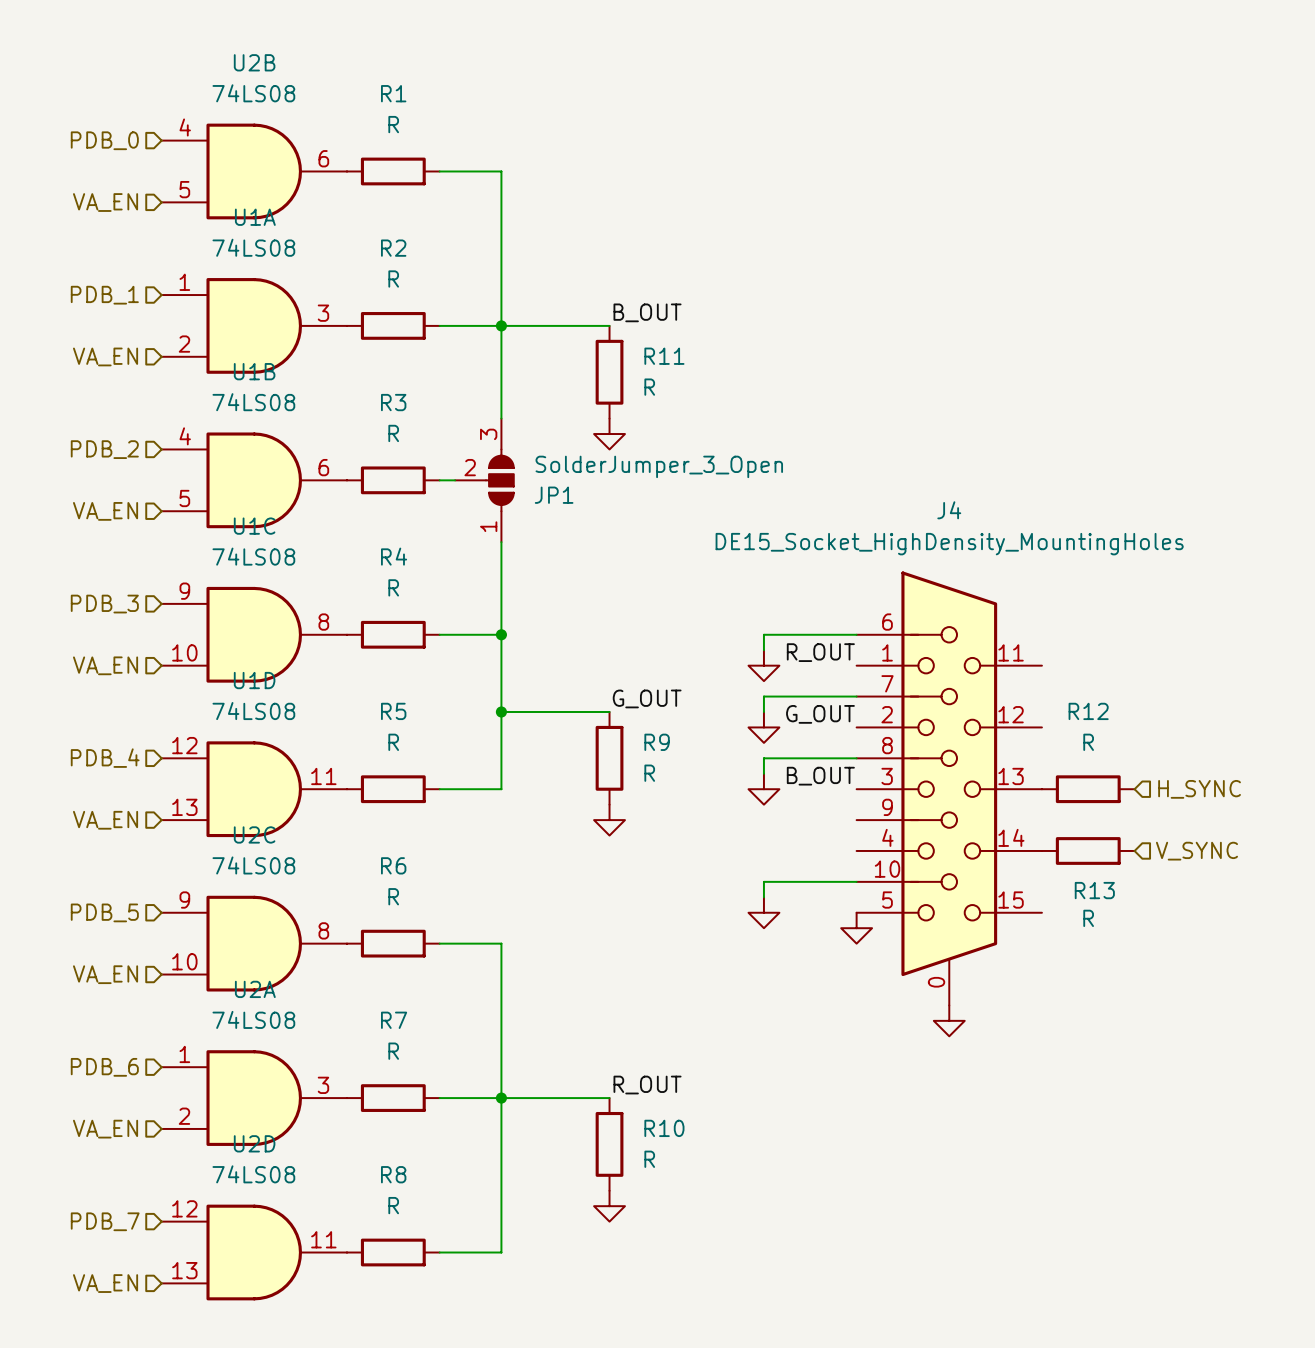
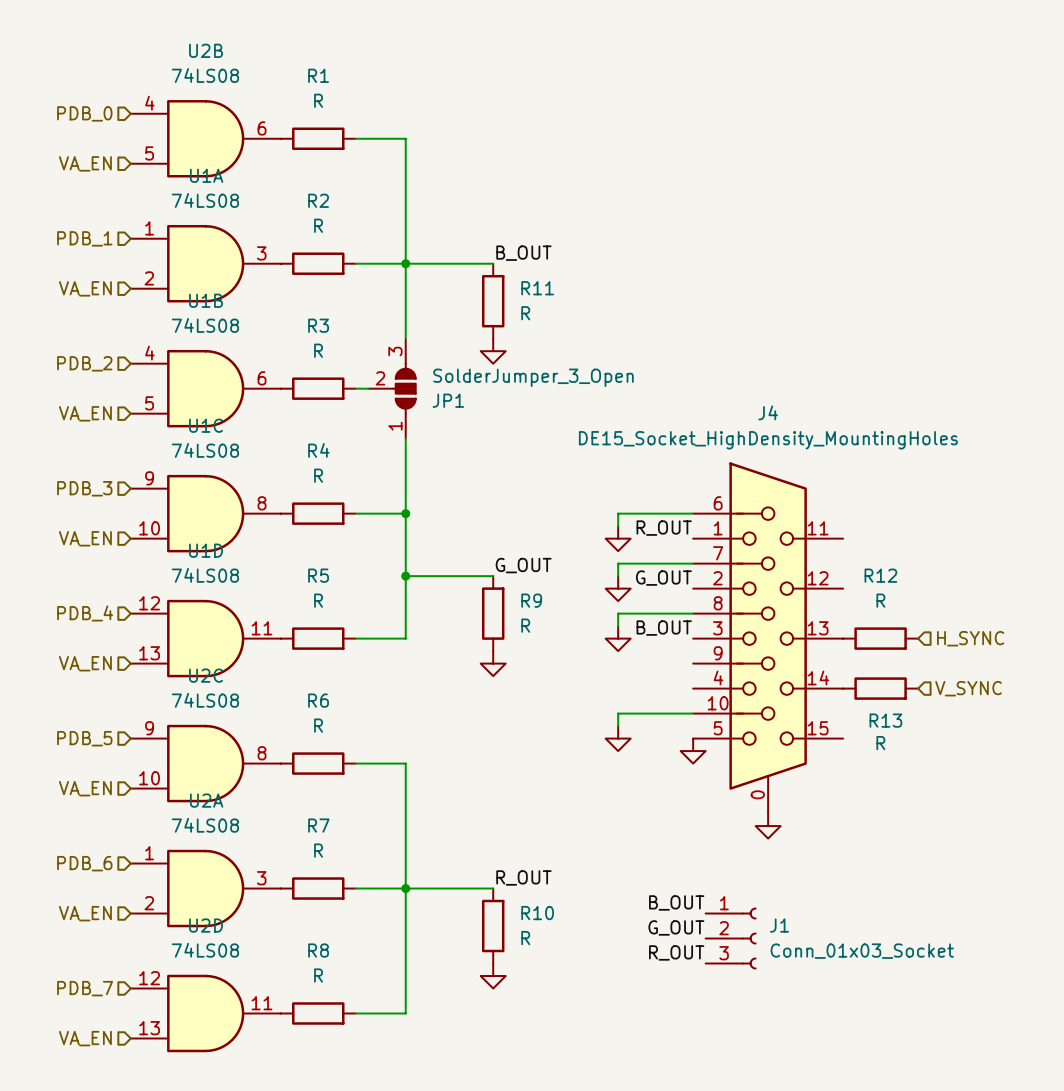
label: none -> B_OUT (676, 902)
label: none -> G_OUT (676, 927)
J1: none -> Conn_01x03_Socket (731, 938)
label: none -> R_OUT (676, 952)

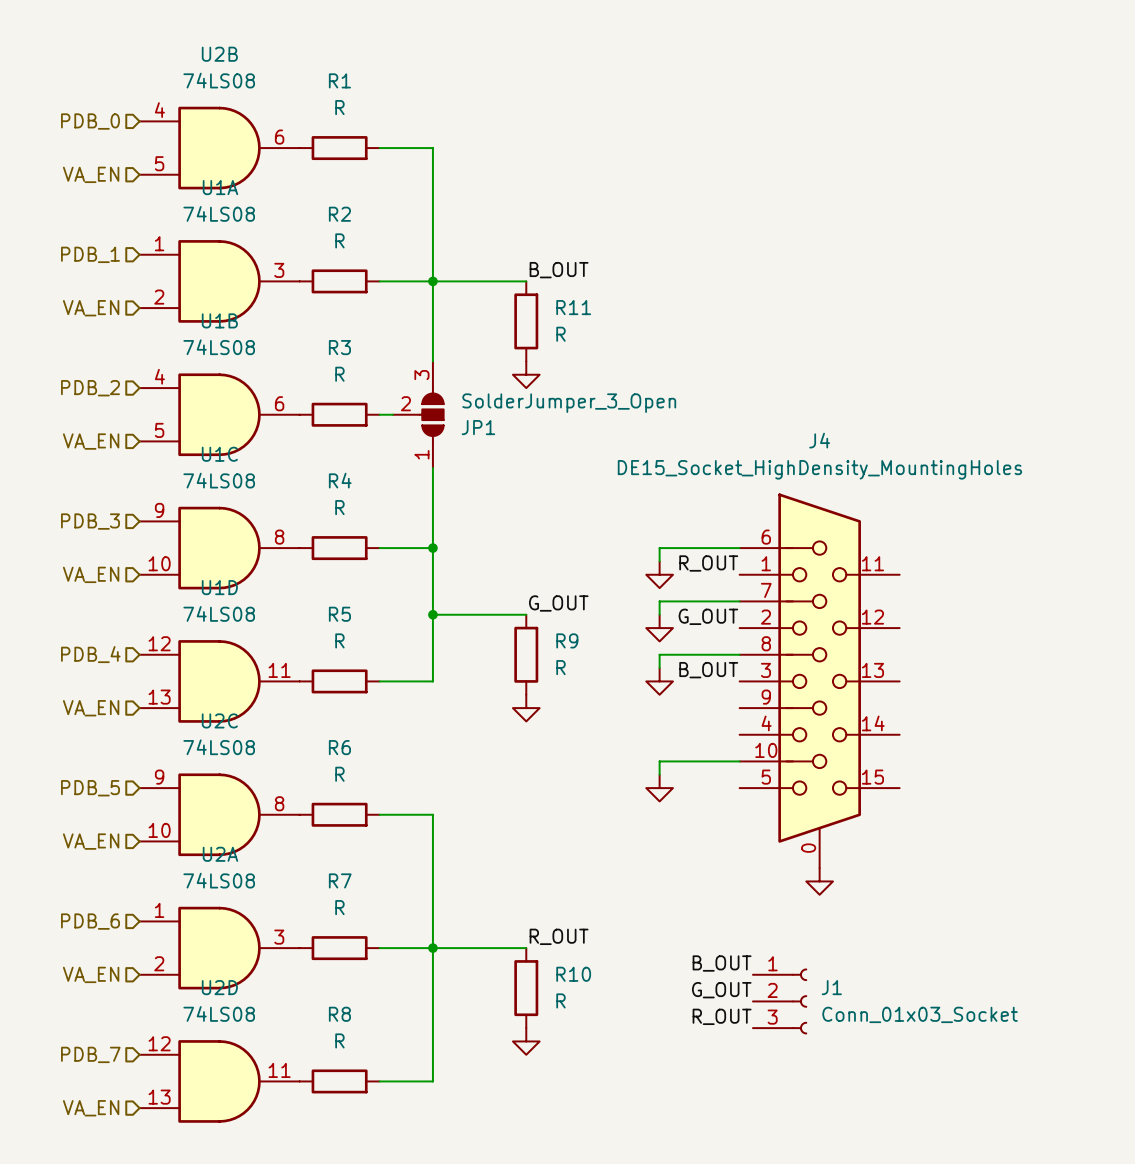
R12: R (880, 638) -> none
hierarchical label: H_SYNC (970, 638) -> none
R13: R (880, 688) -> none
hierarchical label: V_SYNC (968, 688) -> none
power symbol: (693, 751) -> none

